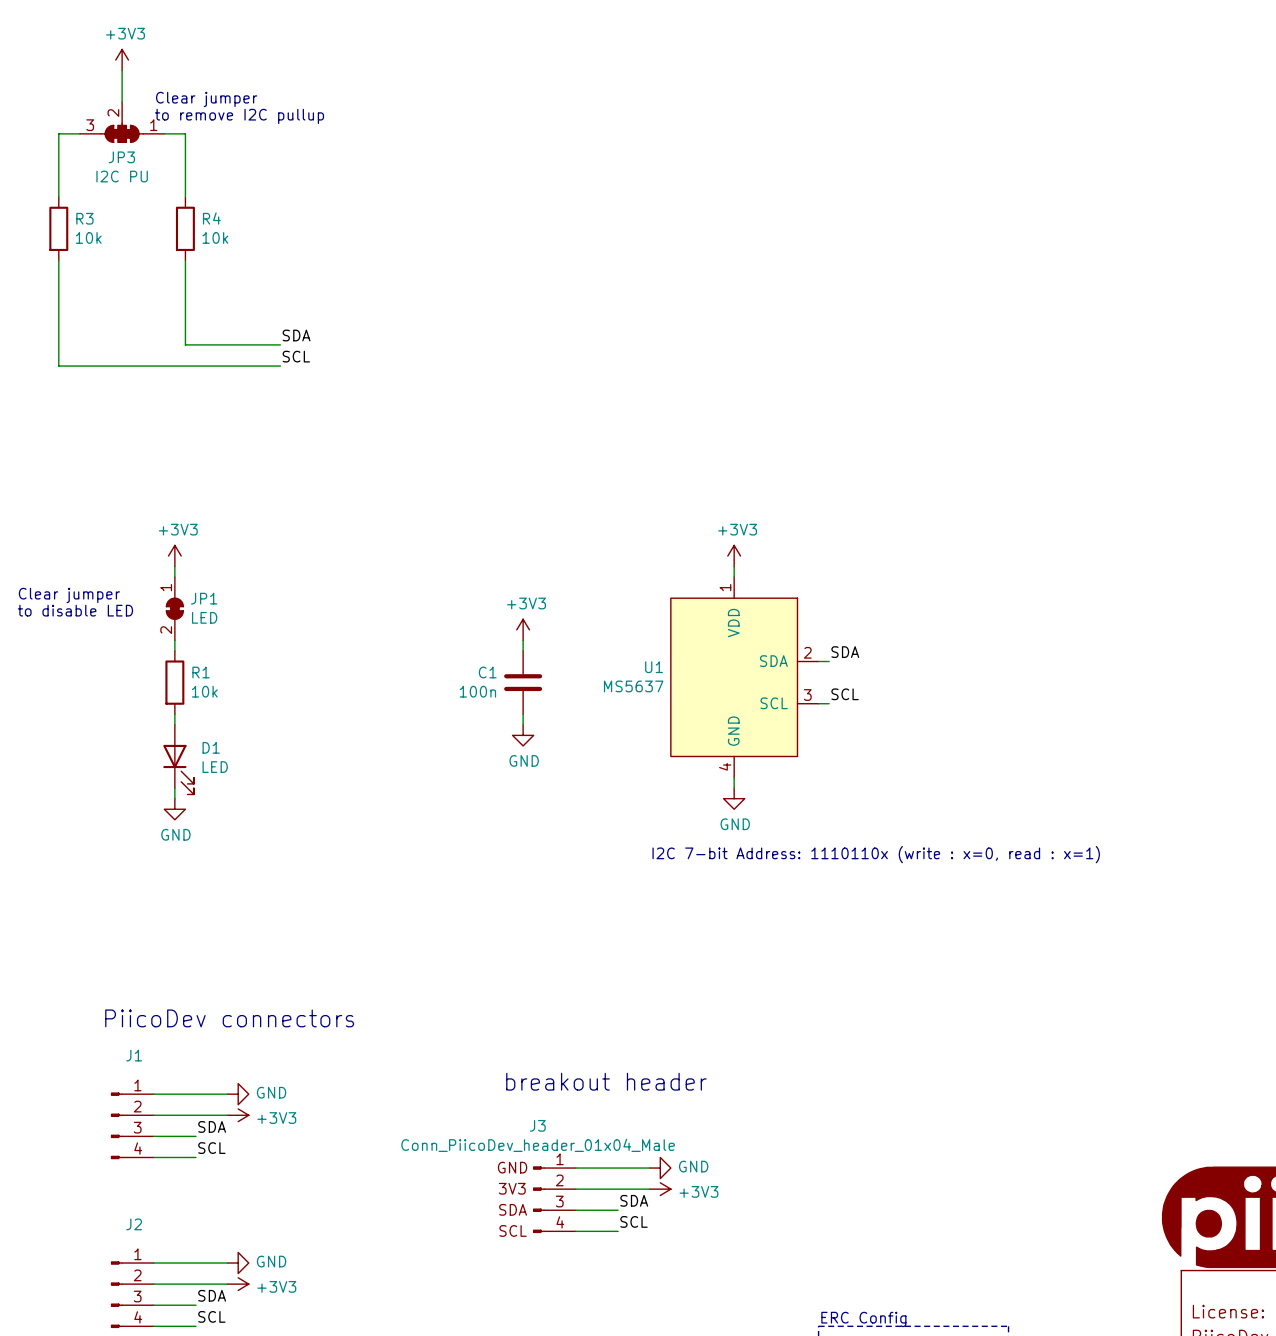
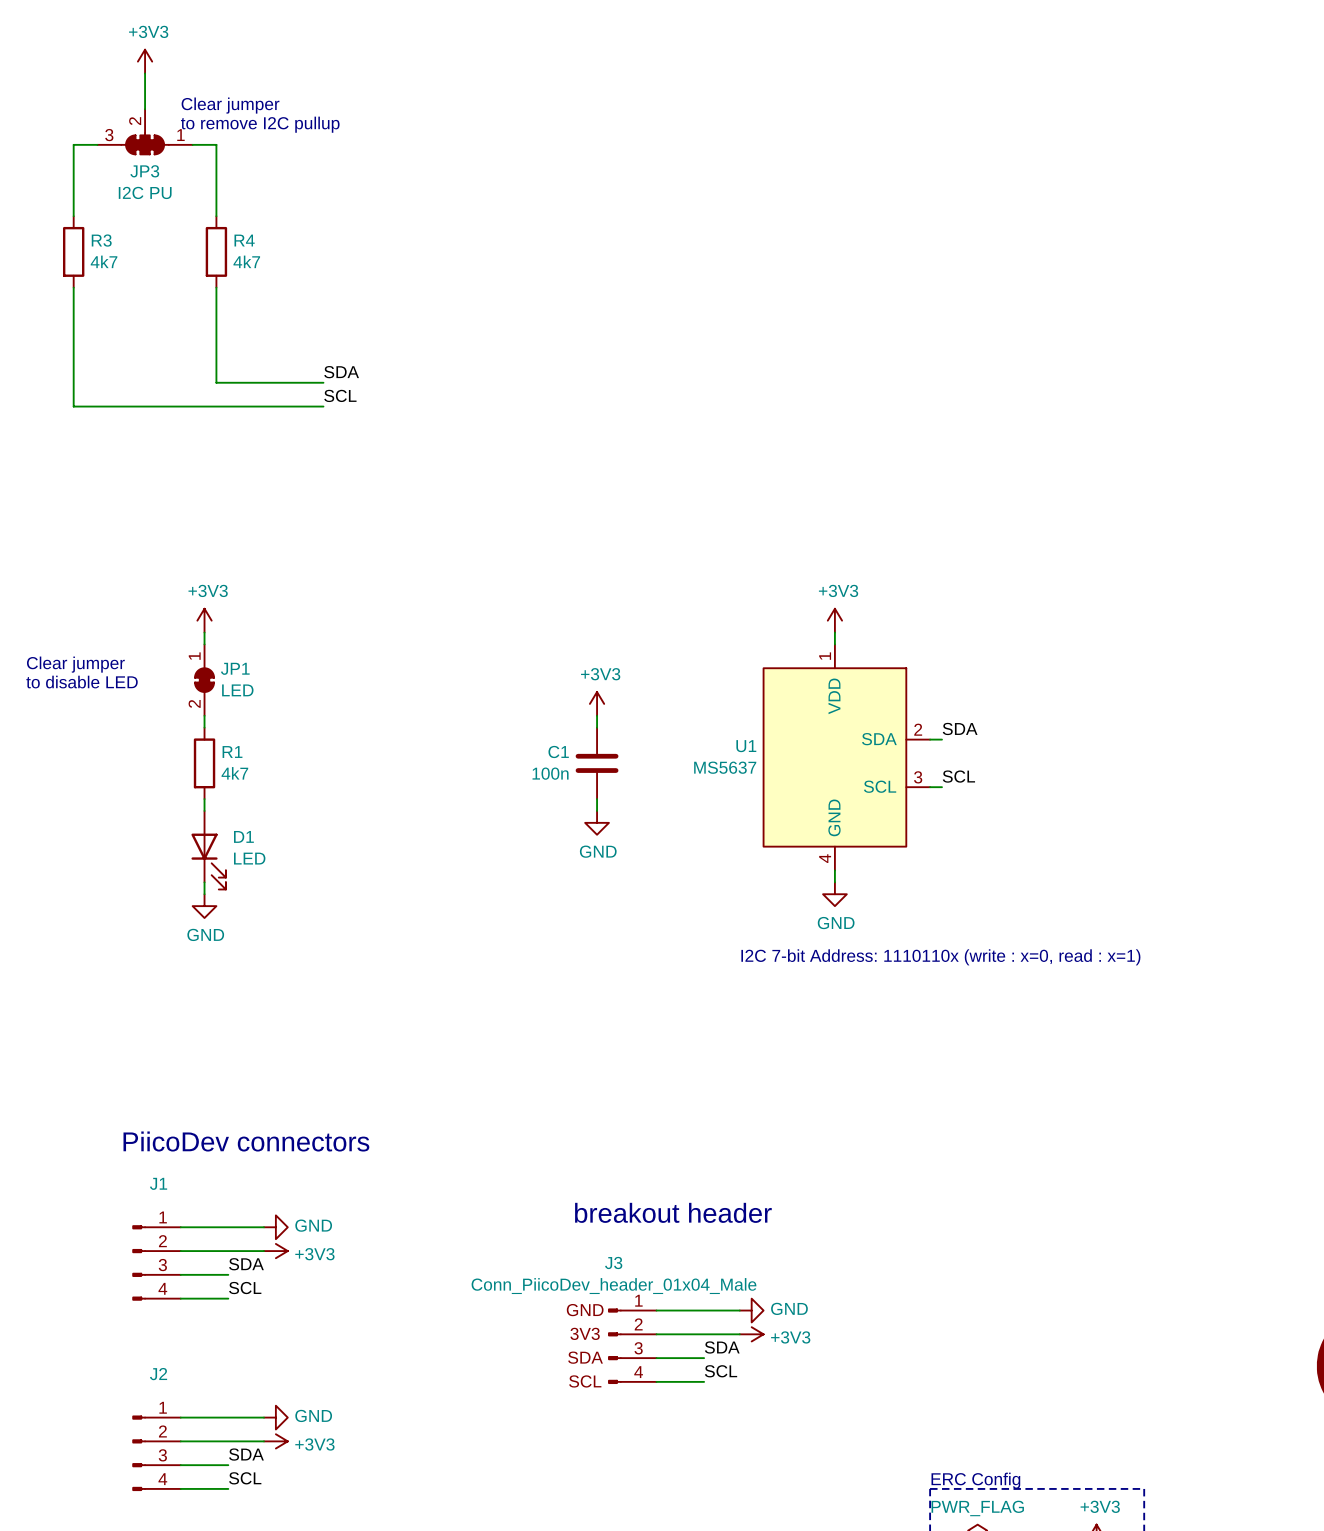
R3 value: 10k (88, 237) -> 4k7 (104, 261)
R4 value: 10k (215, 237) -> 4k7 (246, 261)
R1 value: 10k (204, 691) -> 4k7 (234, 773)

